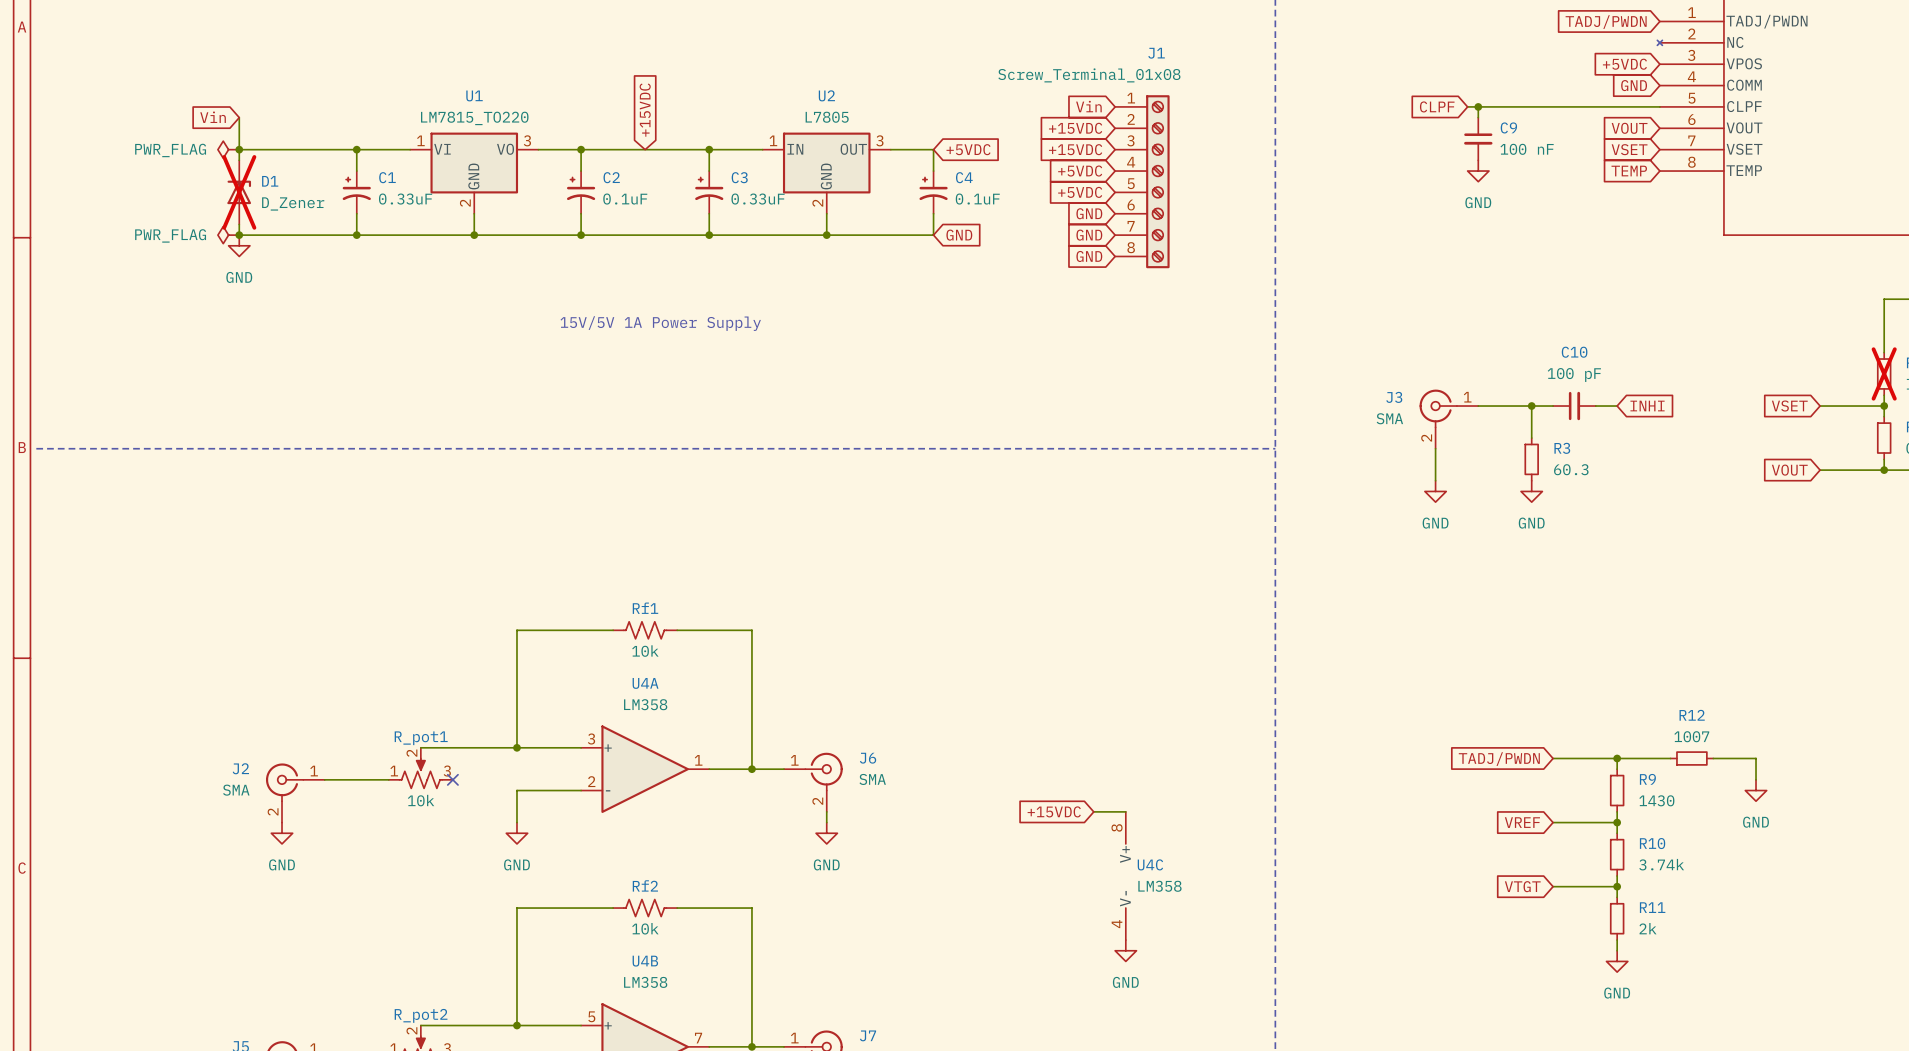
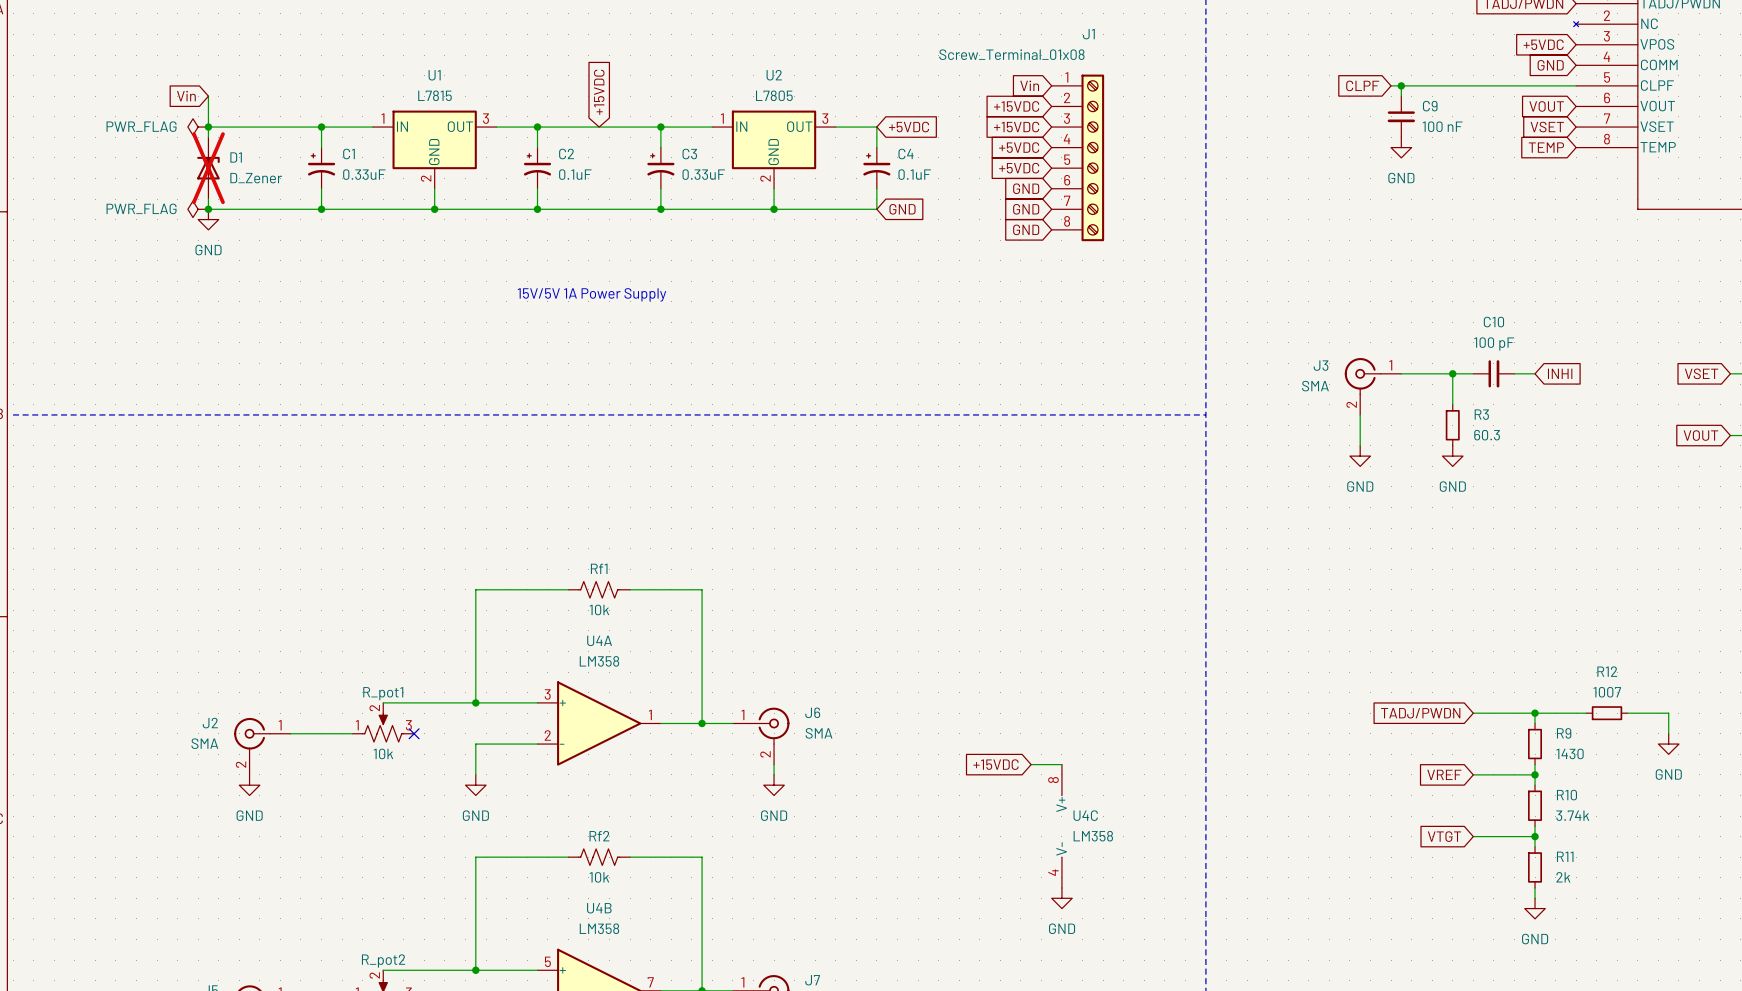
U1 value: LM7815_TO220 (474, 118) -> L7815 (434, 95)
U1 pin name: VI (442, 149) -> IN (402, 126)
U1 pin name: VO (505, 149) -> OUT (460, 126)

